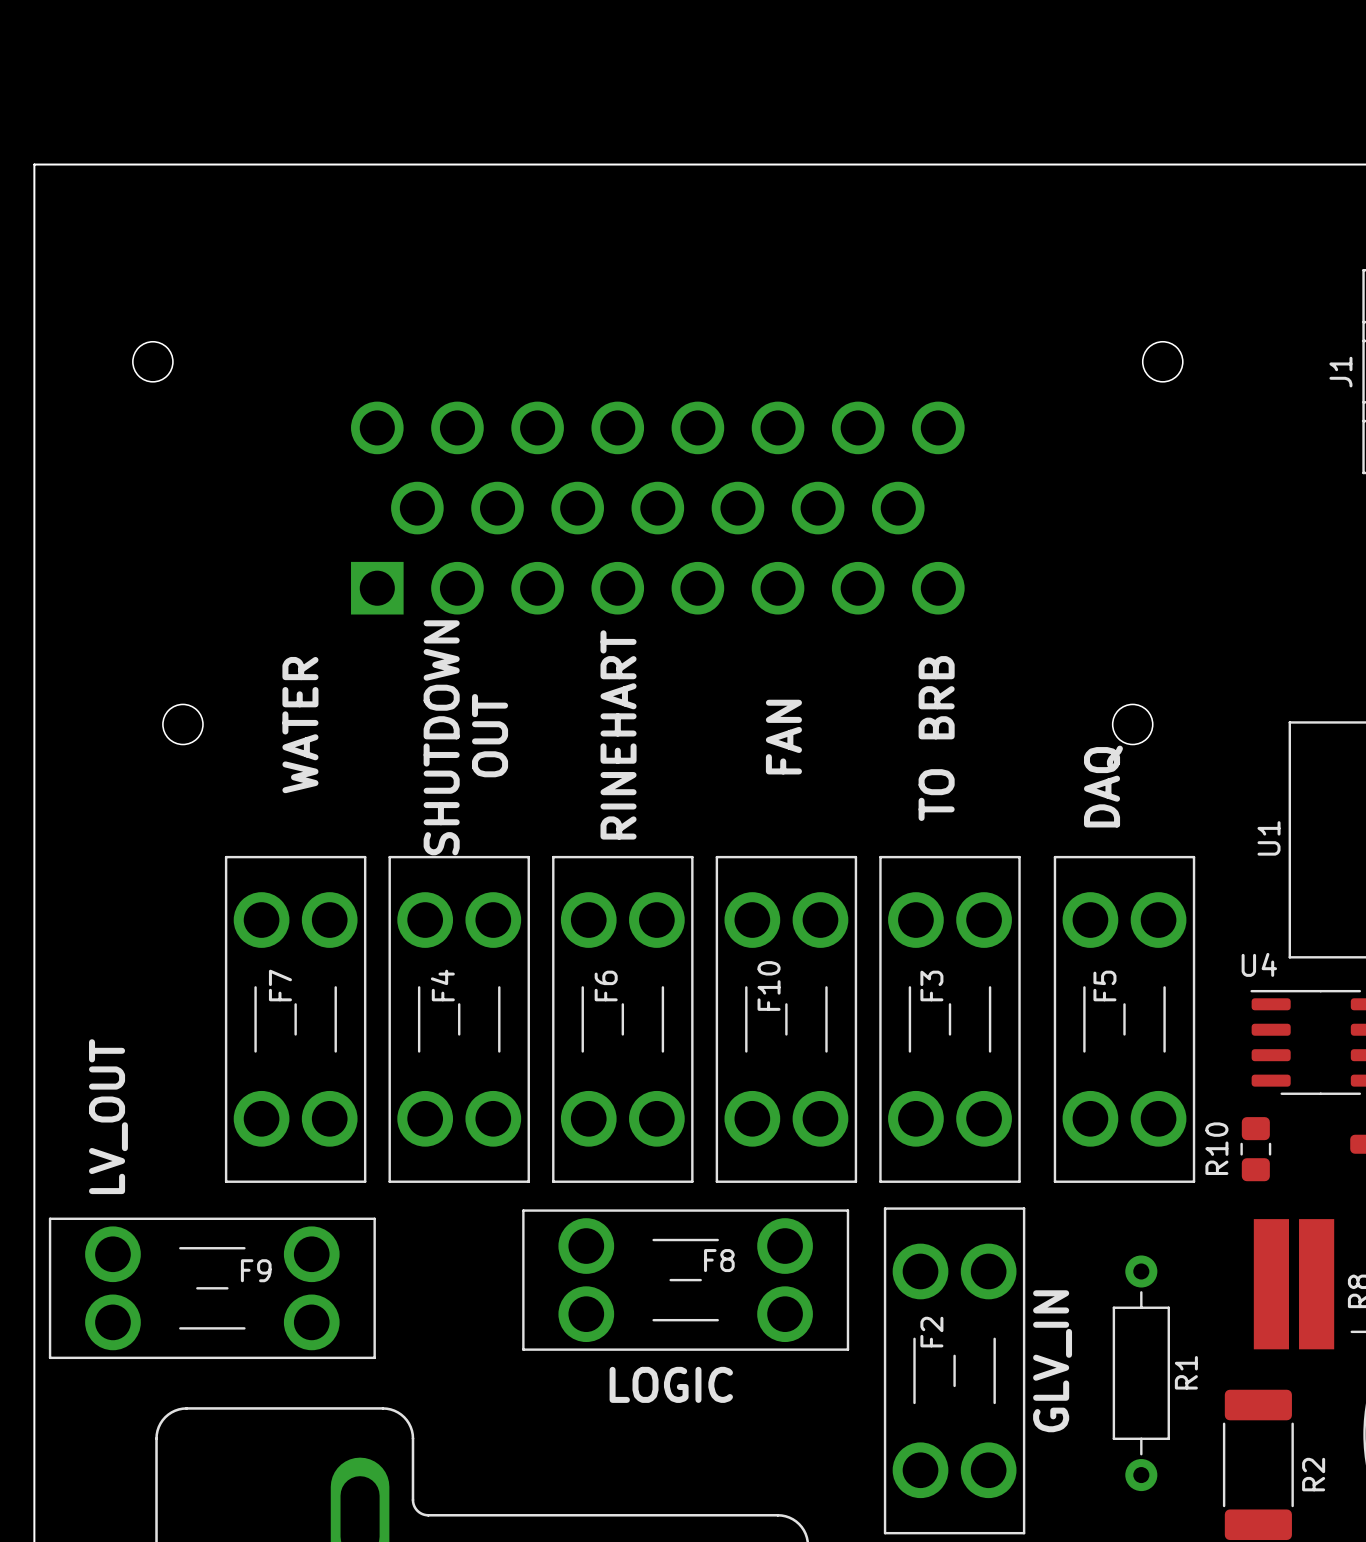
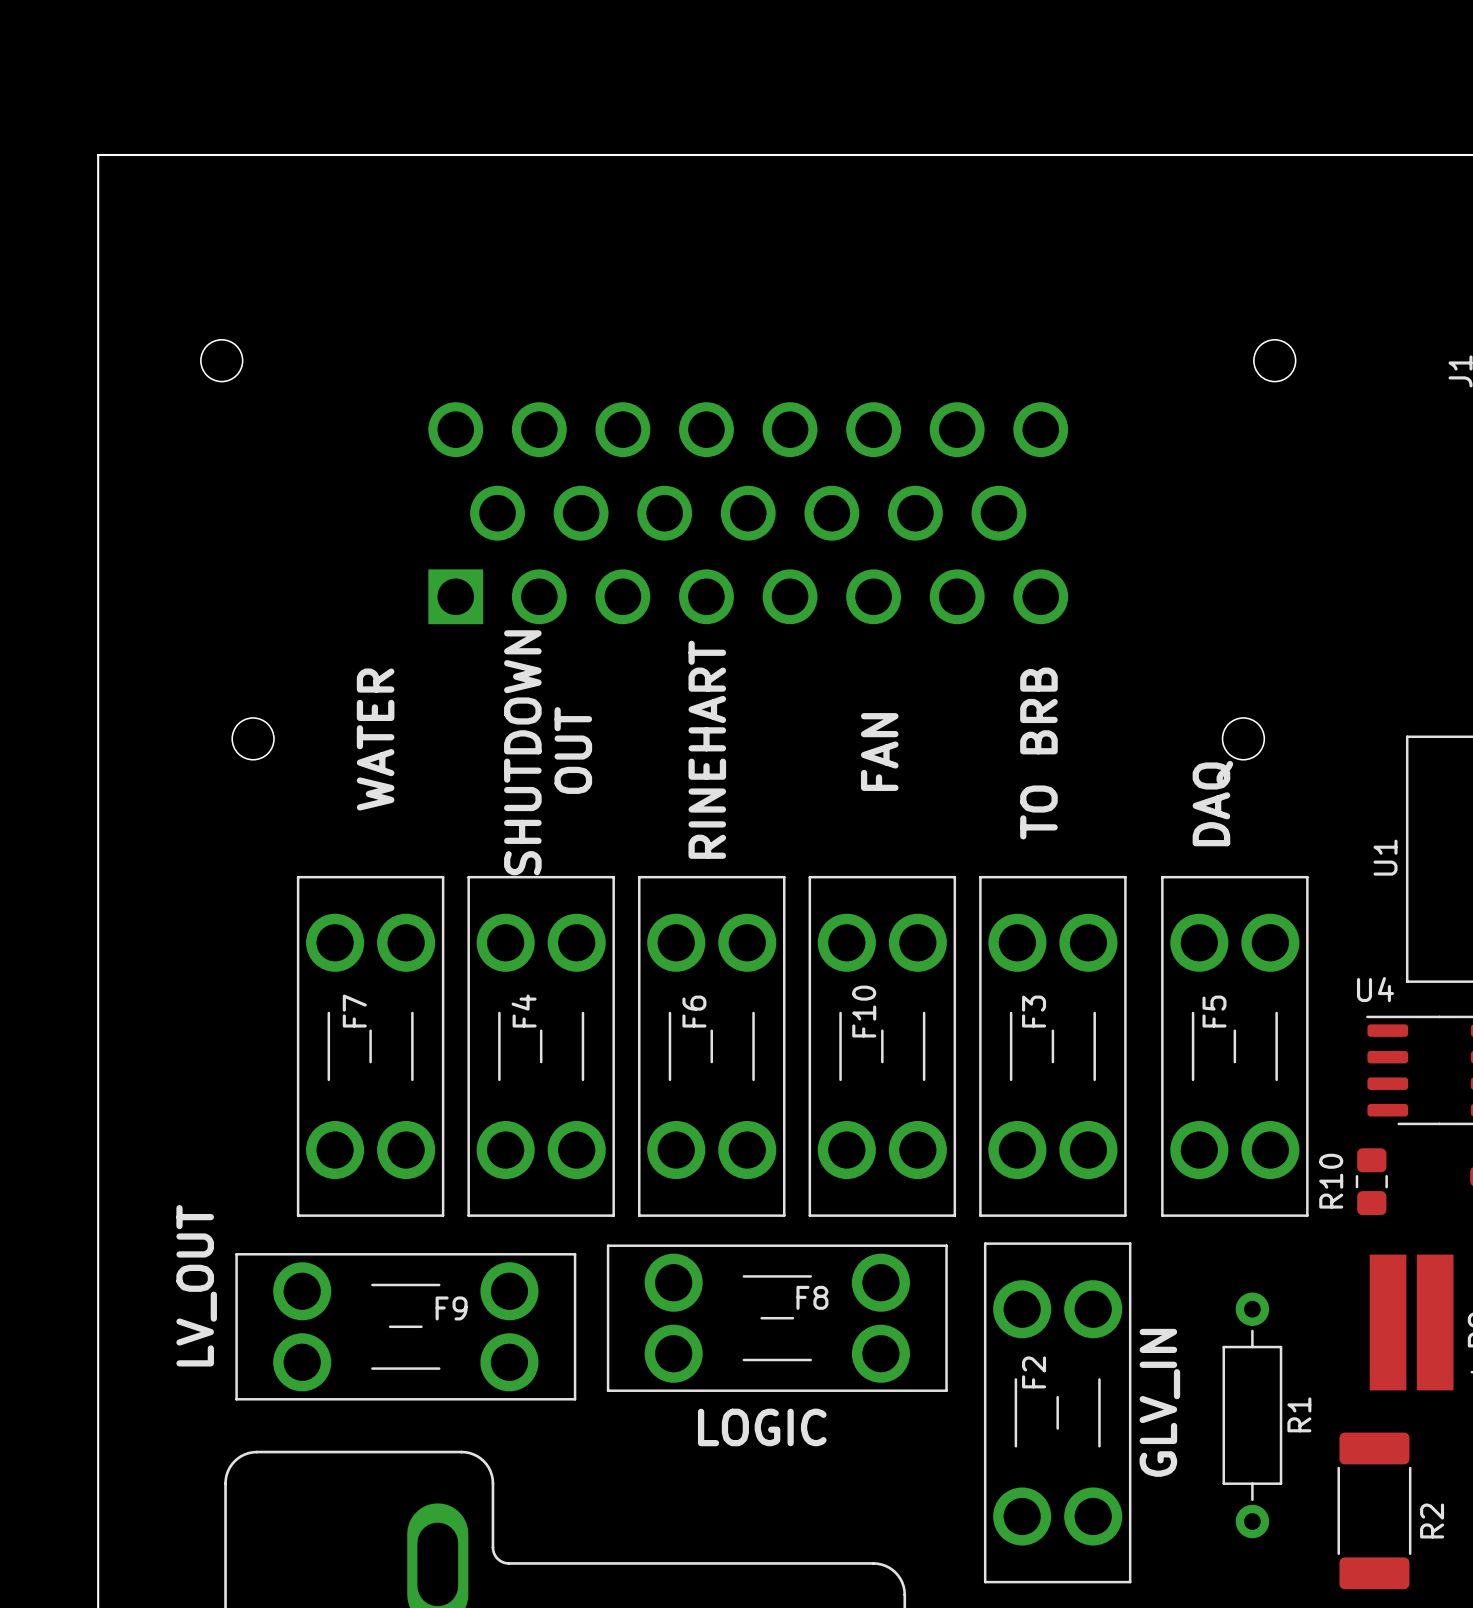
text position: LV_OUT (108, 1116) -> LV_OUT (196, 1285)
F9 position: (212, 1288) -> (405, 1326)

